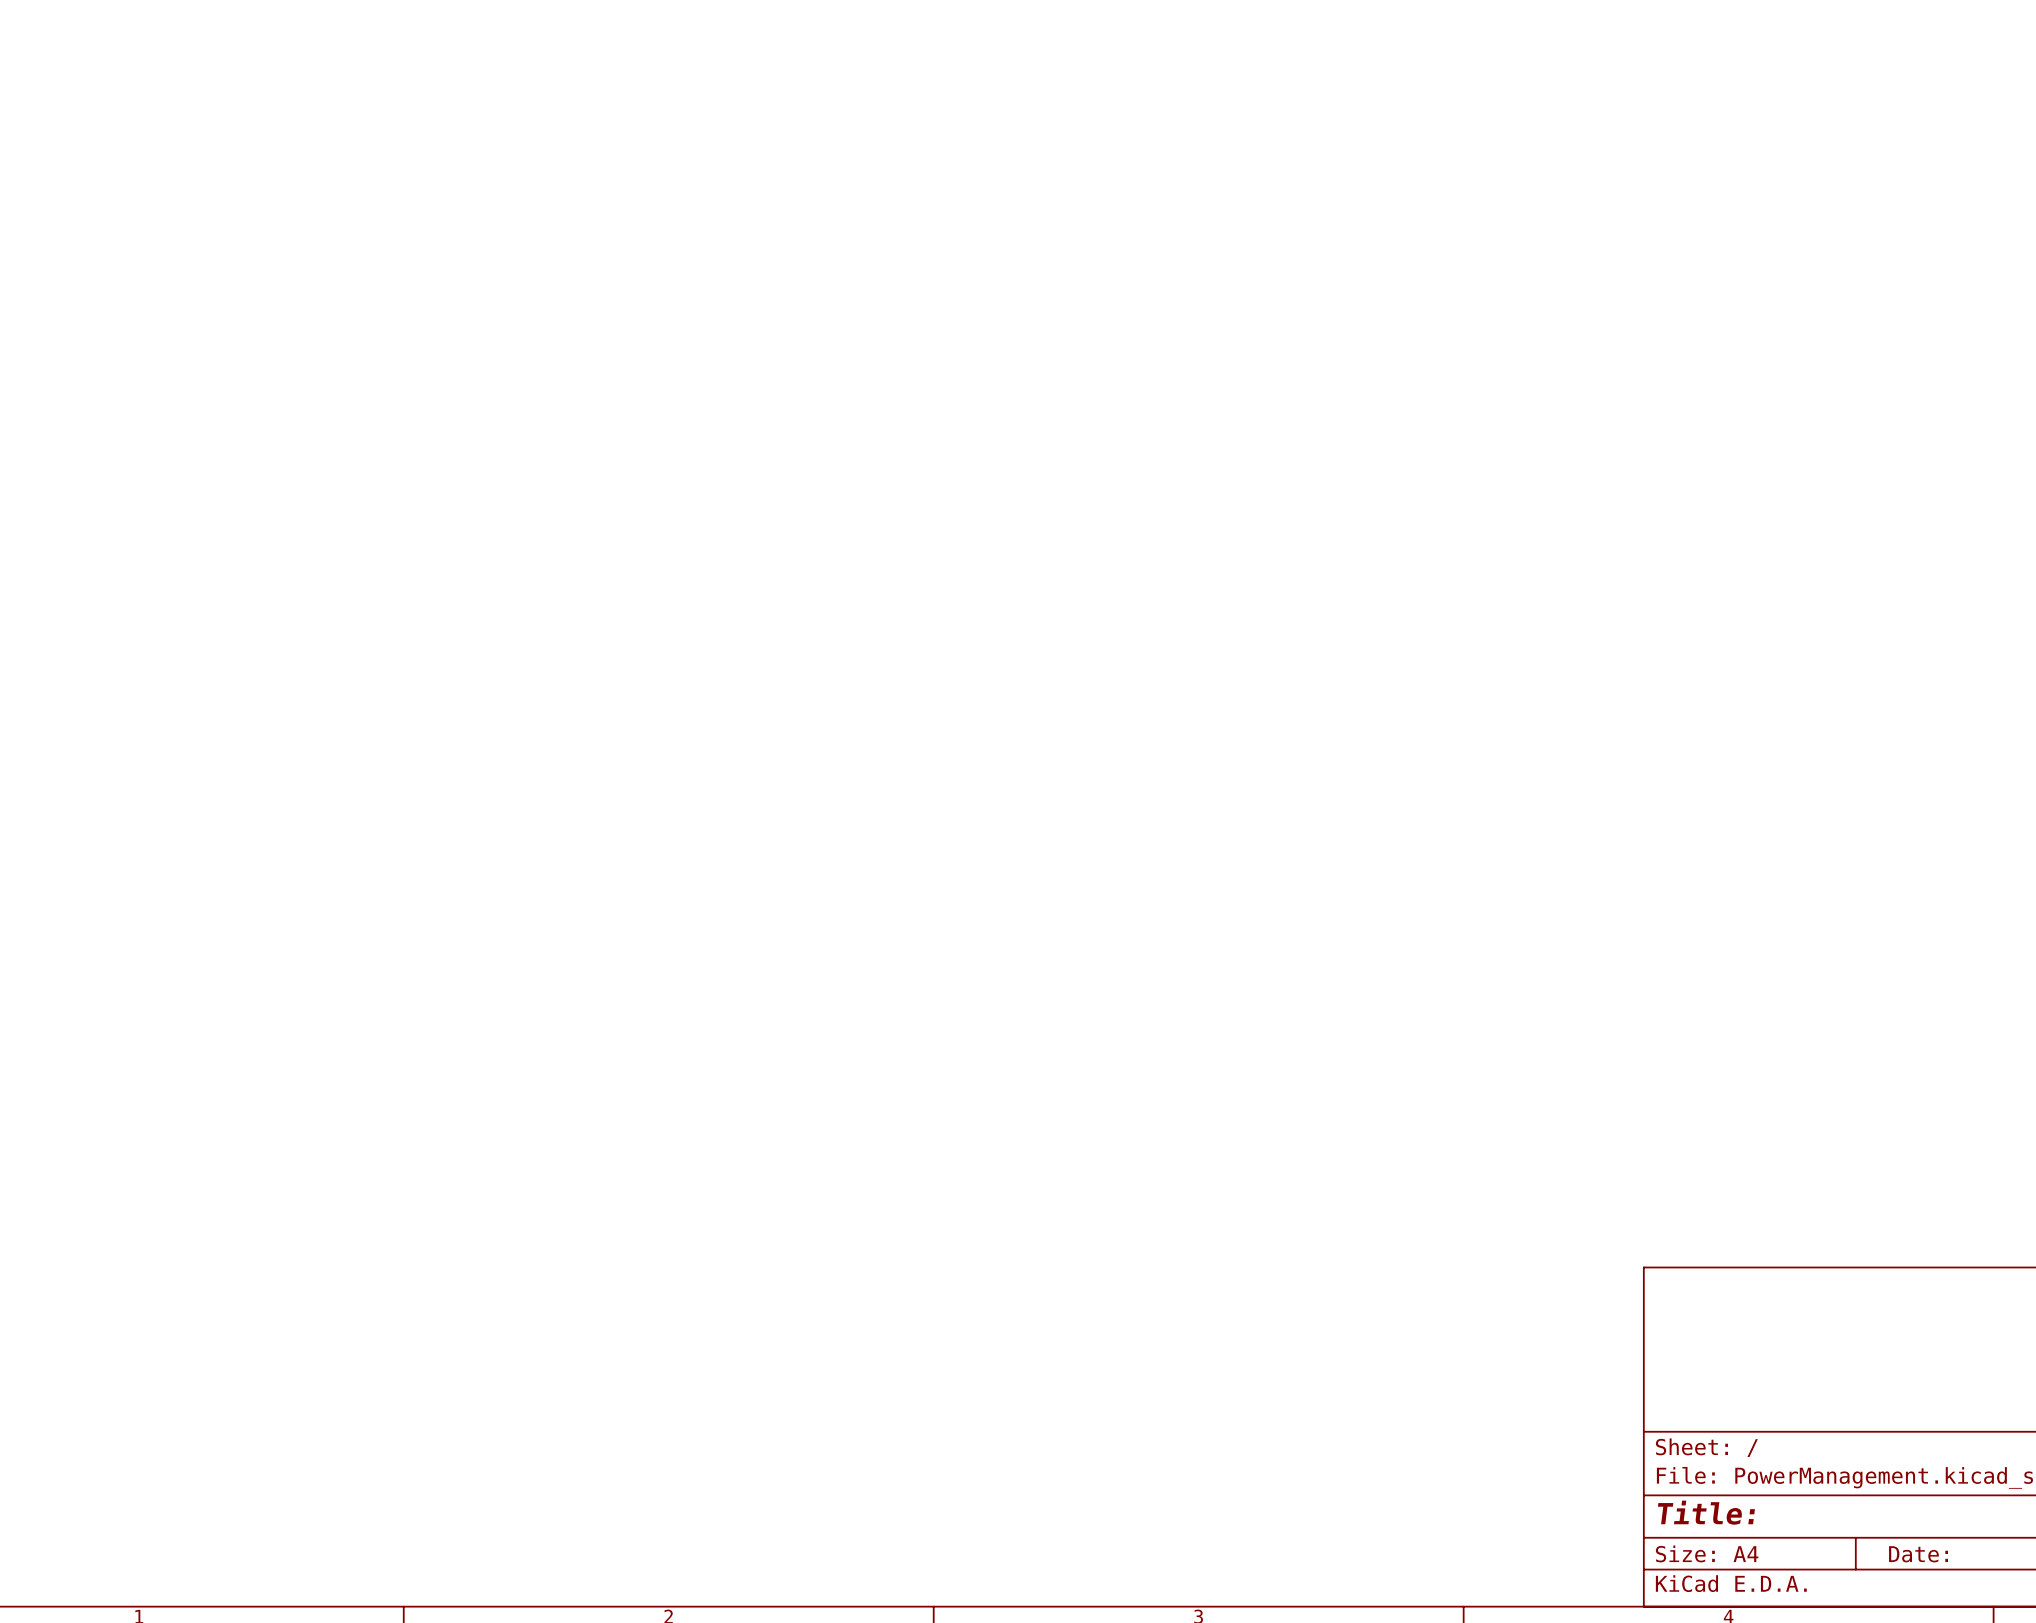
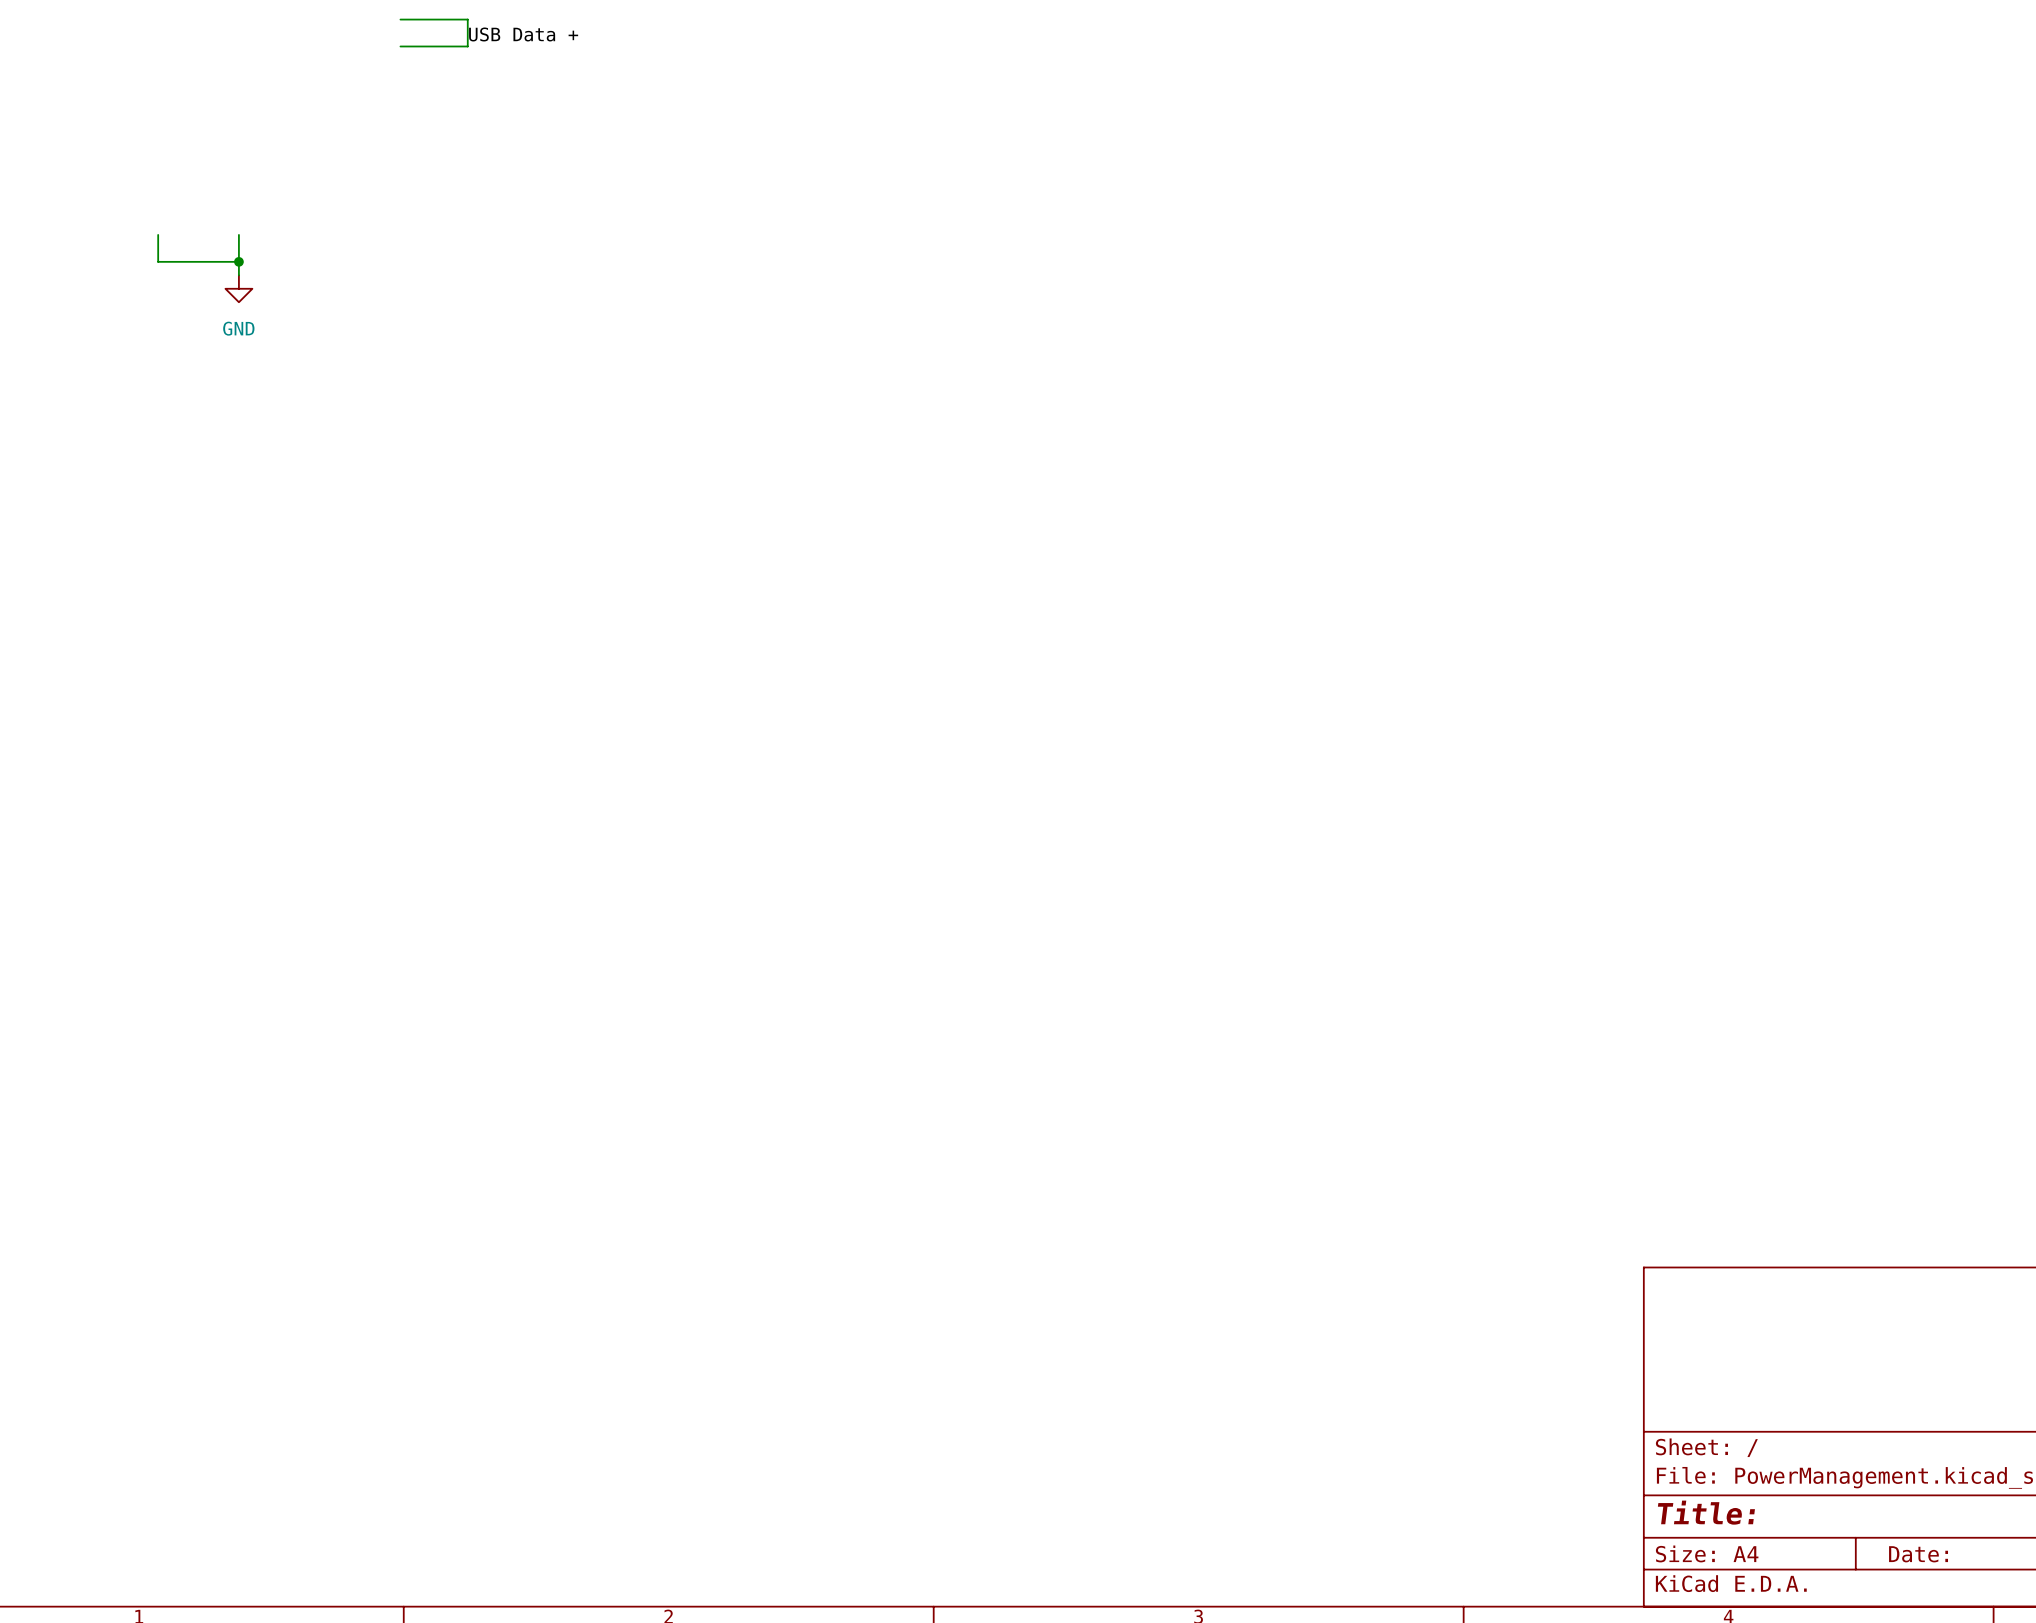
wire: none -> (400, 19) (467, 19) (467, 46) (400, 46)
label: none -> USB Data + (523, 34)
wire: none -> (158, 234) (158, 261) (238, 261)
wire: none -> (238, 234) (238, 275)
junction: none -> (238, 261)
power symbol: none -> GND (238, 288)

